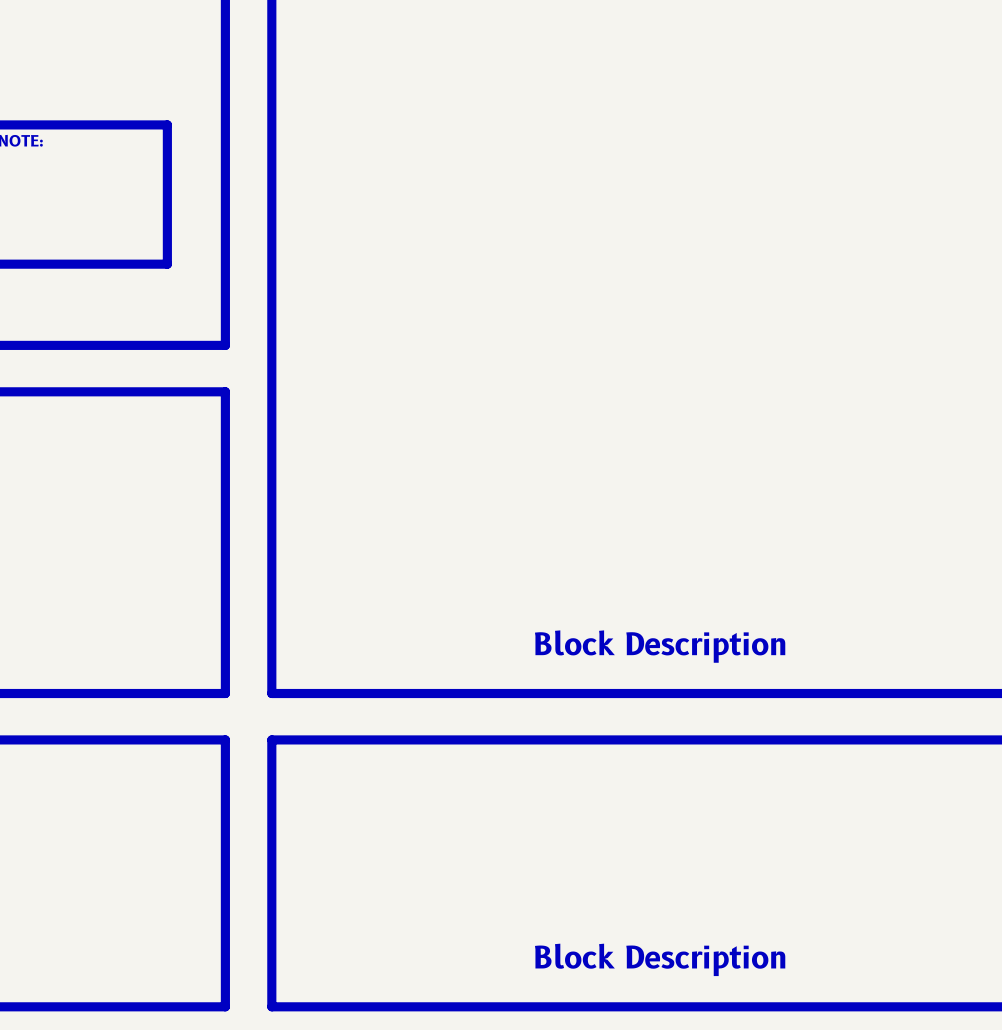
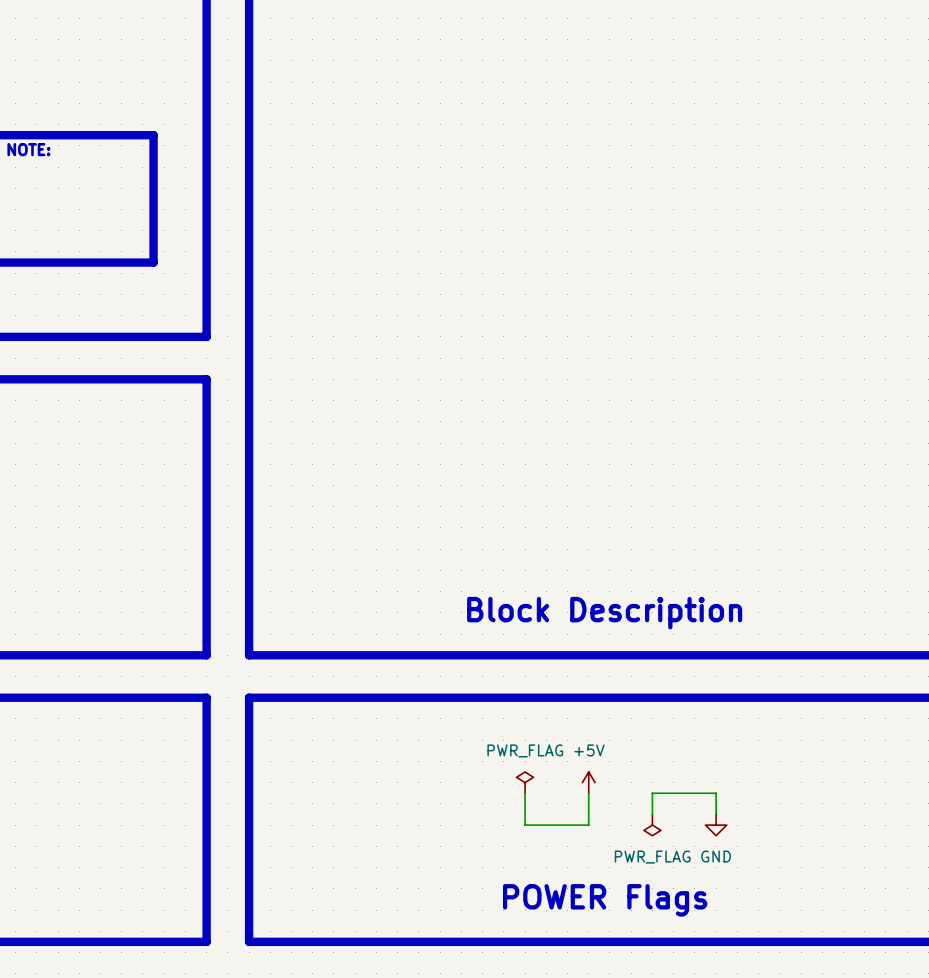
power symbol: none -> PWR_FLAG (525, 782)
power symbol: none -> +5V (588, 782)
wire: none -> (525, 793) (525, 825) (588, 825) (588, 793)
wire: none -> (652, 814) (652, 793) (716, 793) (716, 814)
power symbol: none -> PWR_FLAG (652, 825)
power symbol: none -> GND (716, 825)
text: Block Description (660, 959) -> POWER Flags (605, 900)

